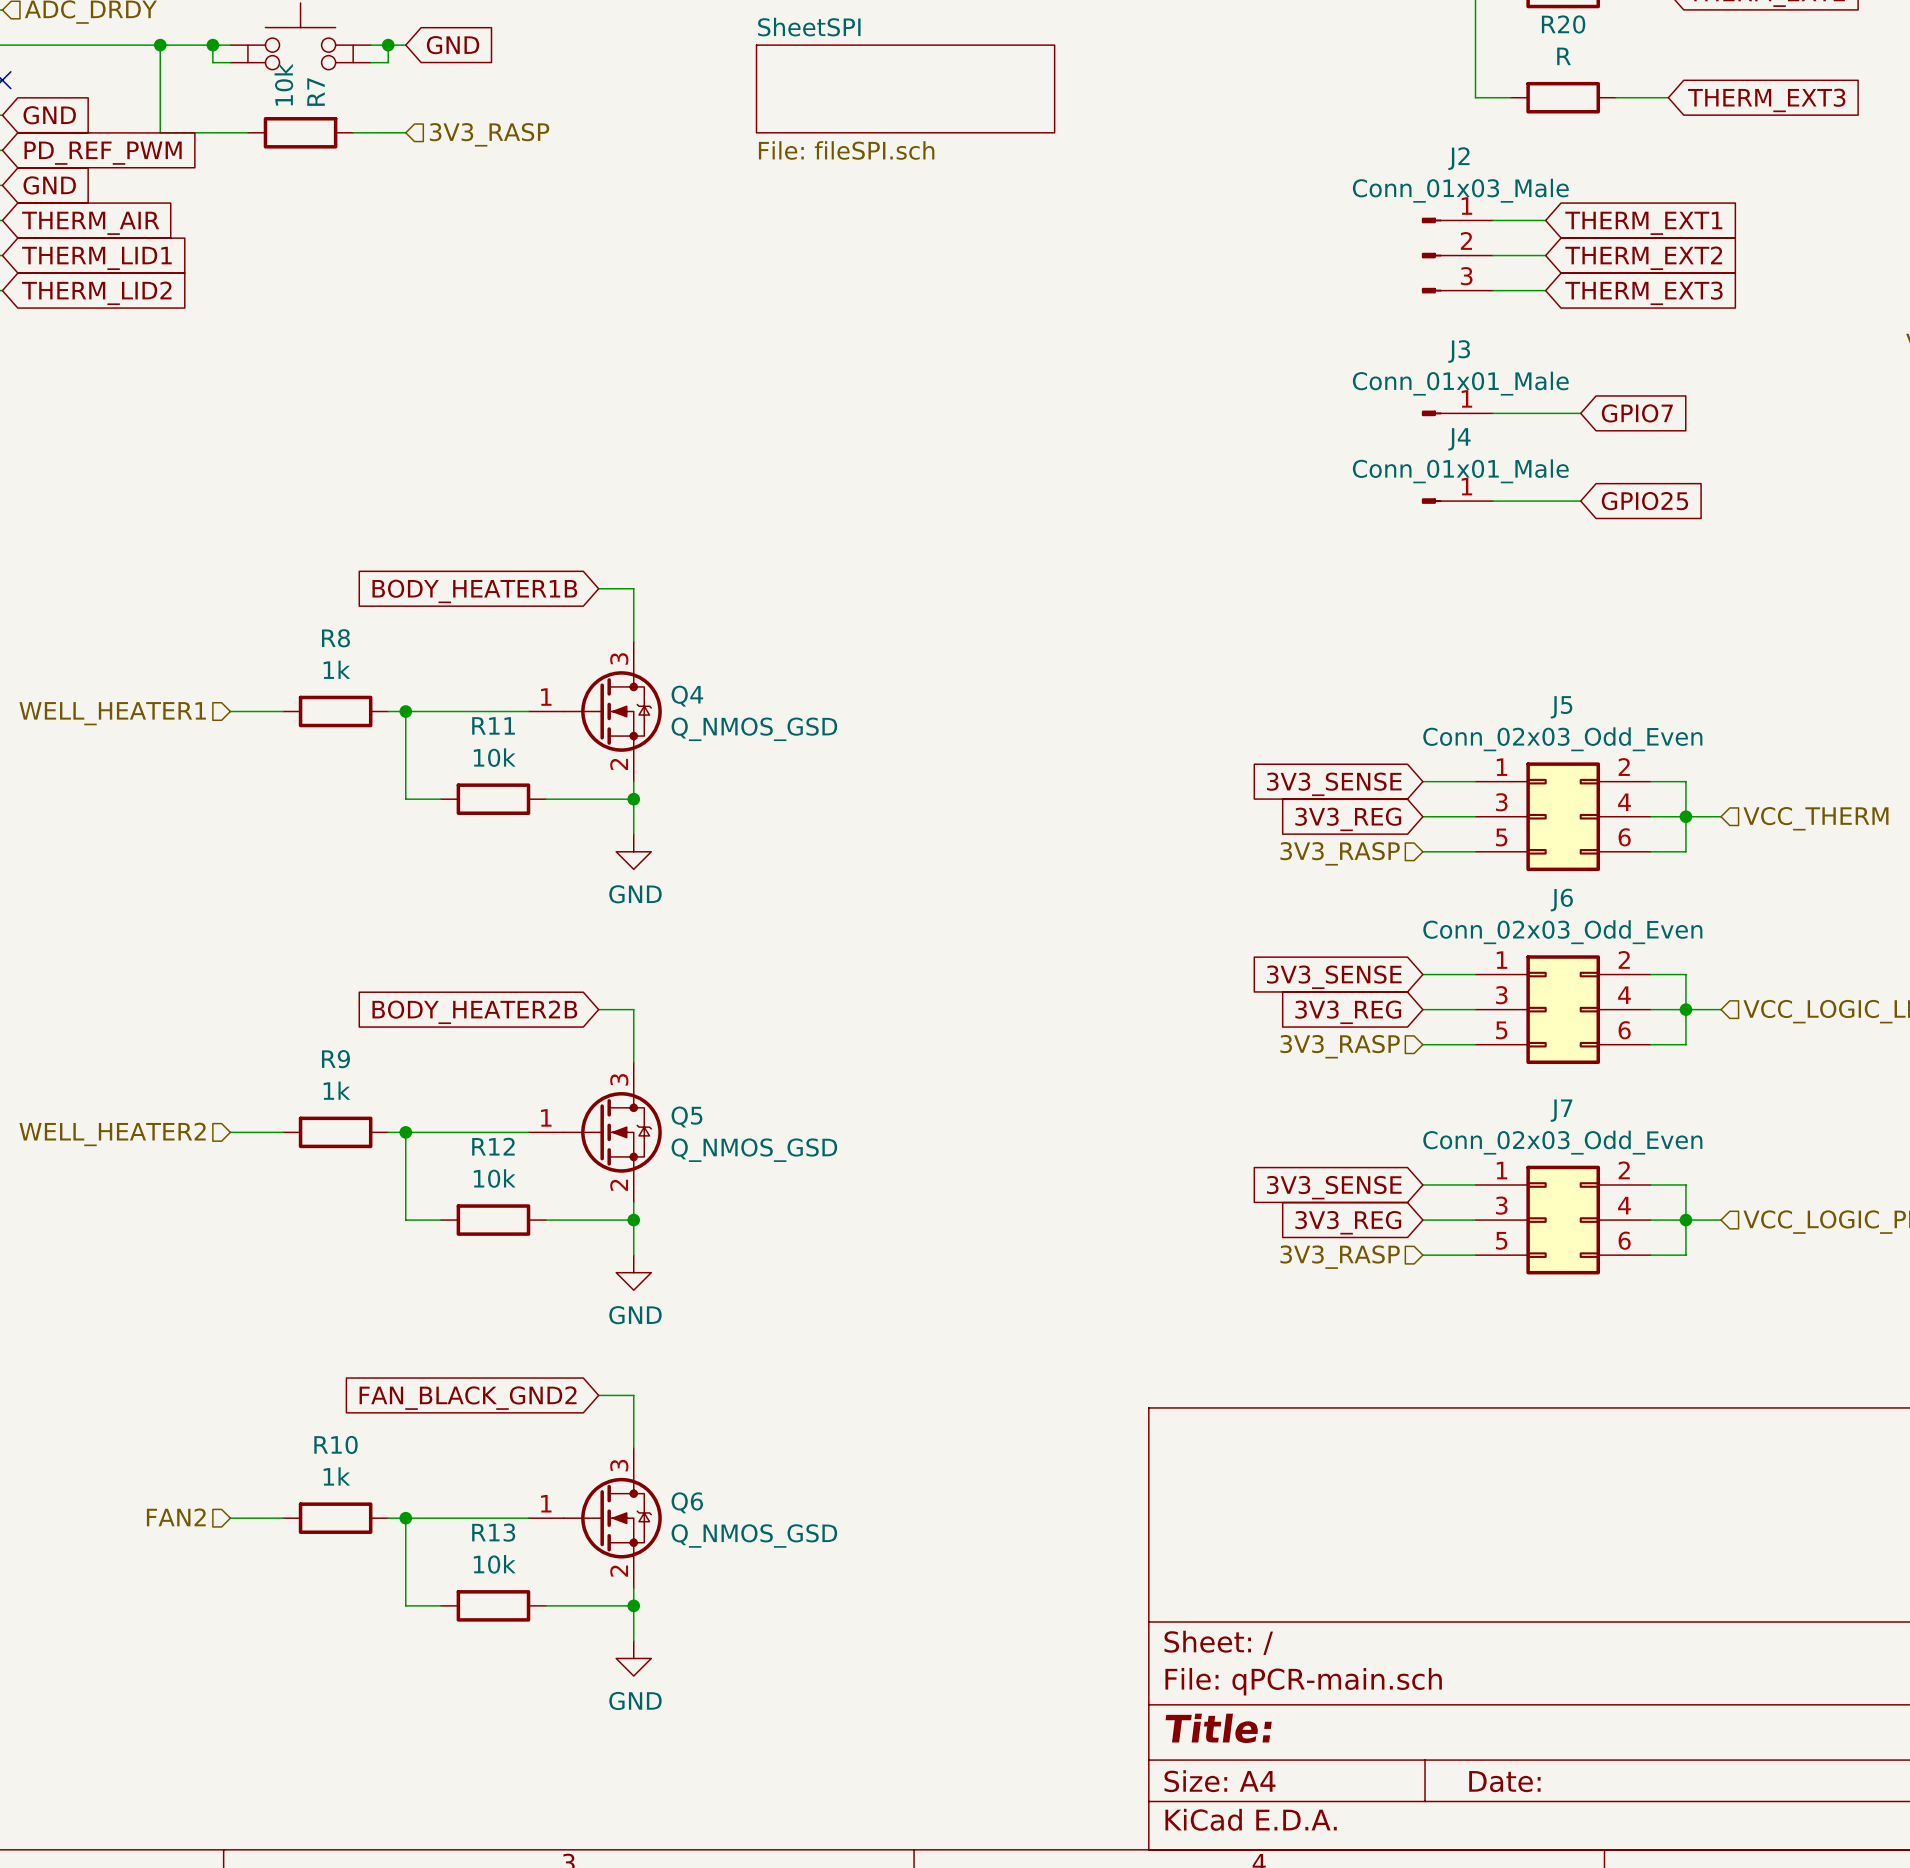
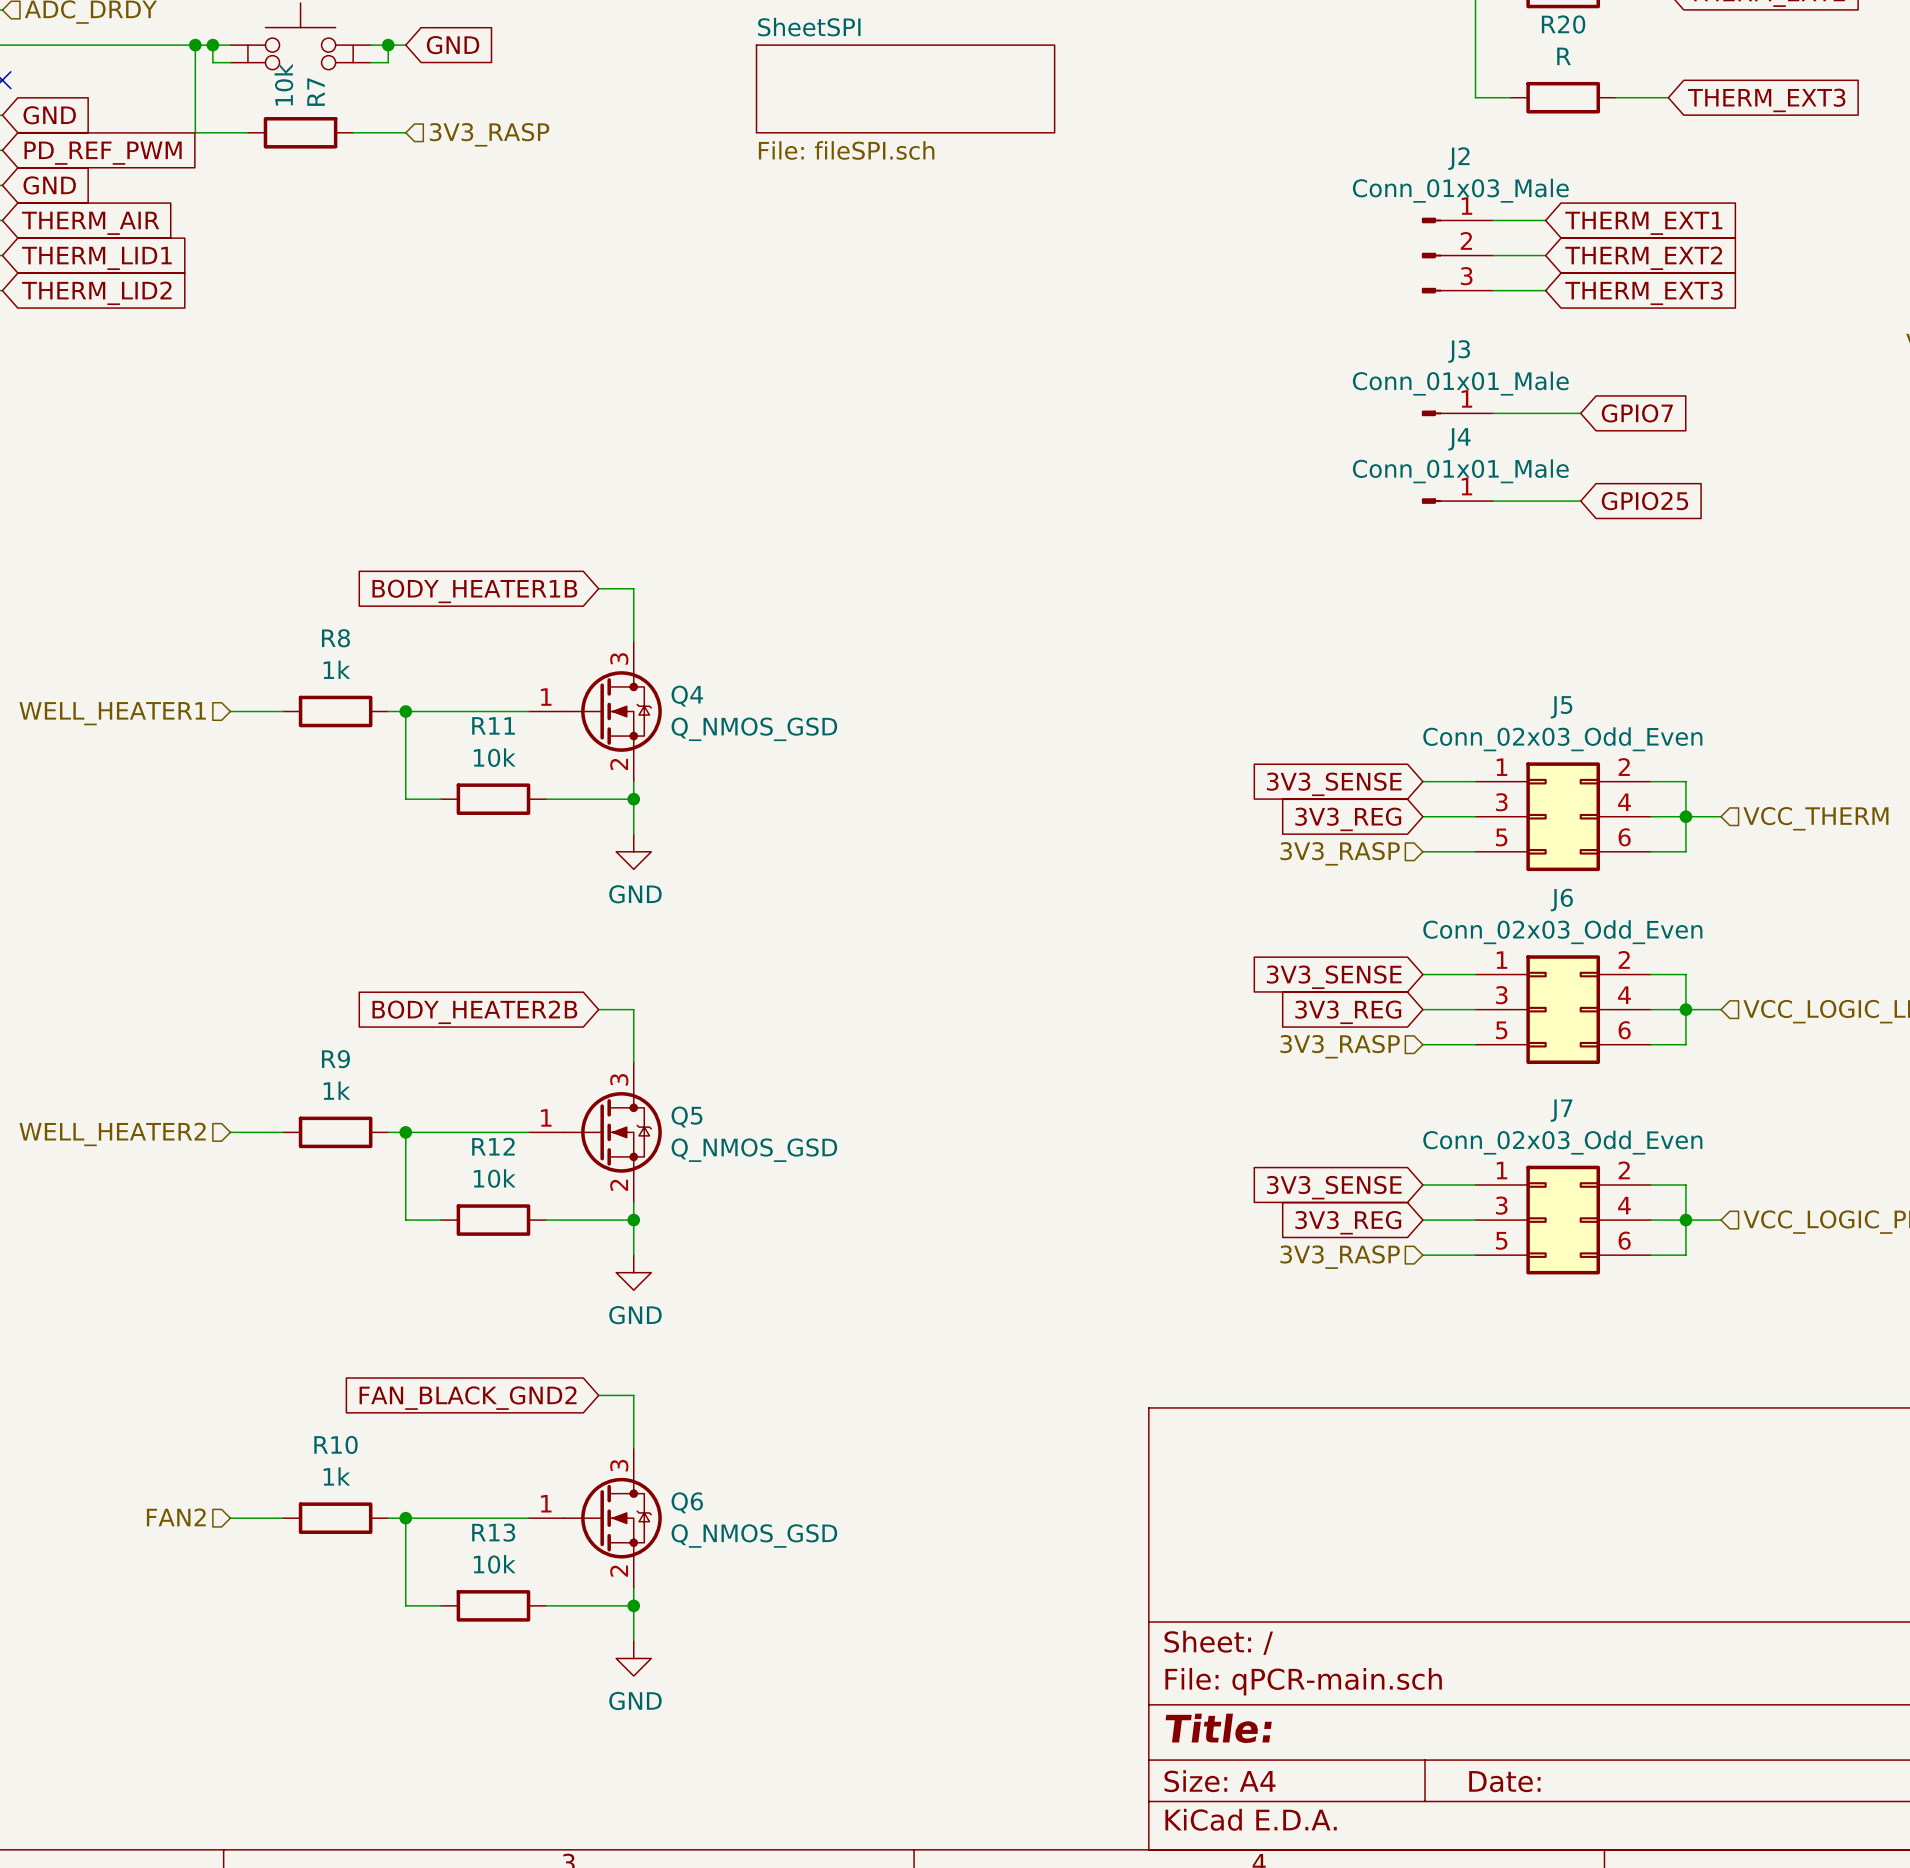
wire: (160, 45) (160, 132) (195, 132) -> (195, 45) (195, 132)
junction position: (160, 45) -> (195, 45)

